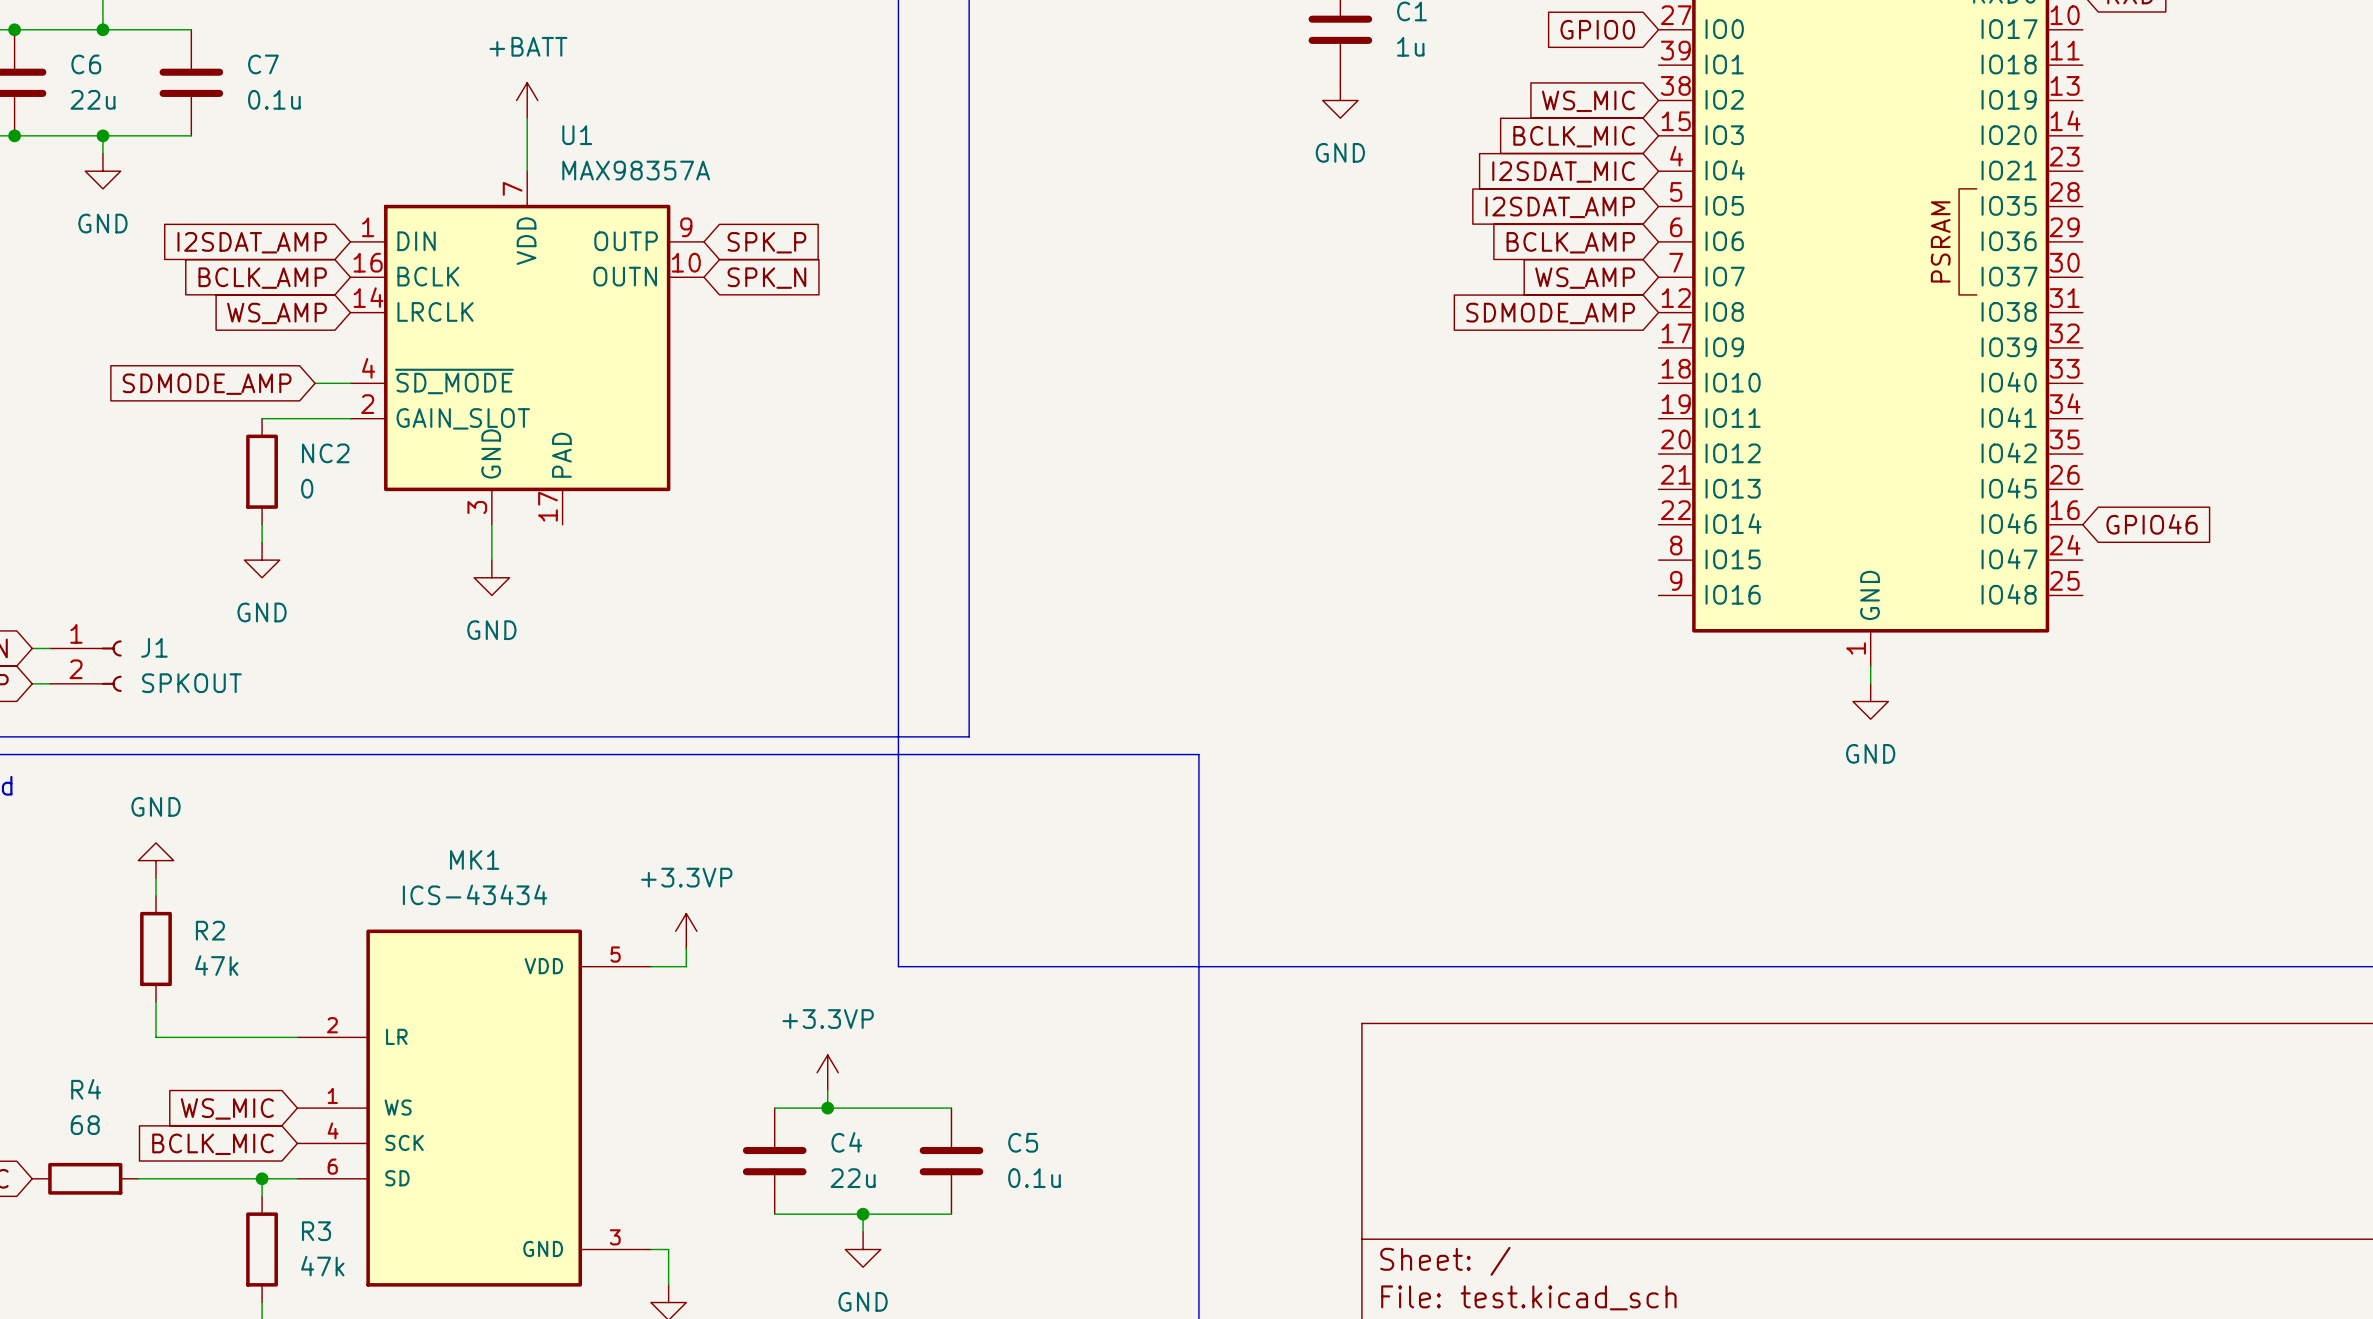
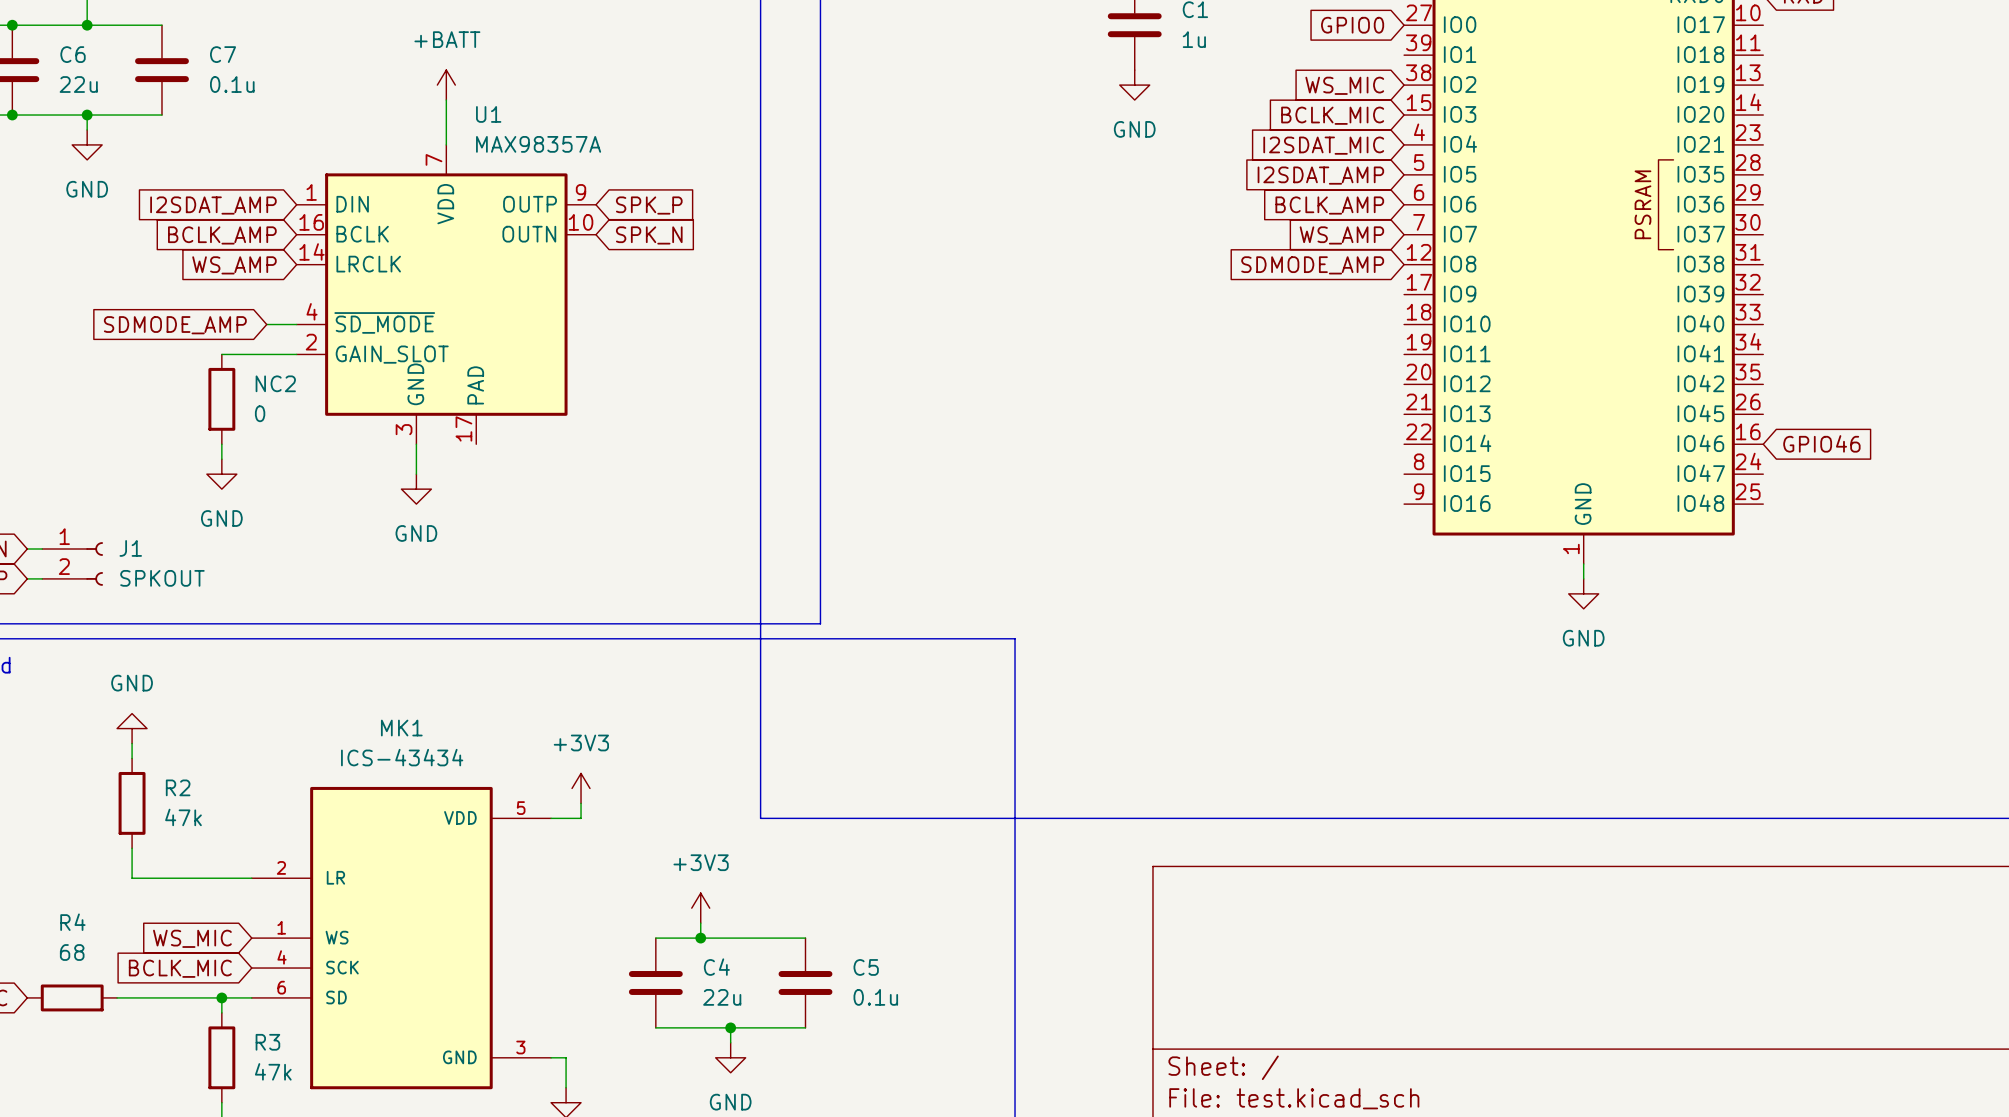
power symbol: +3.3VP (686, 931) -> +3V3 (581, 788)
power symbol: +3.3VP (827, 1072) -> +3V3 (700, 908)

